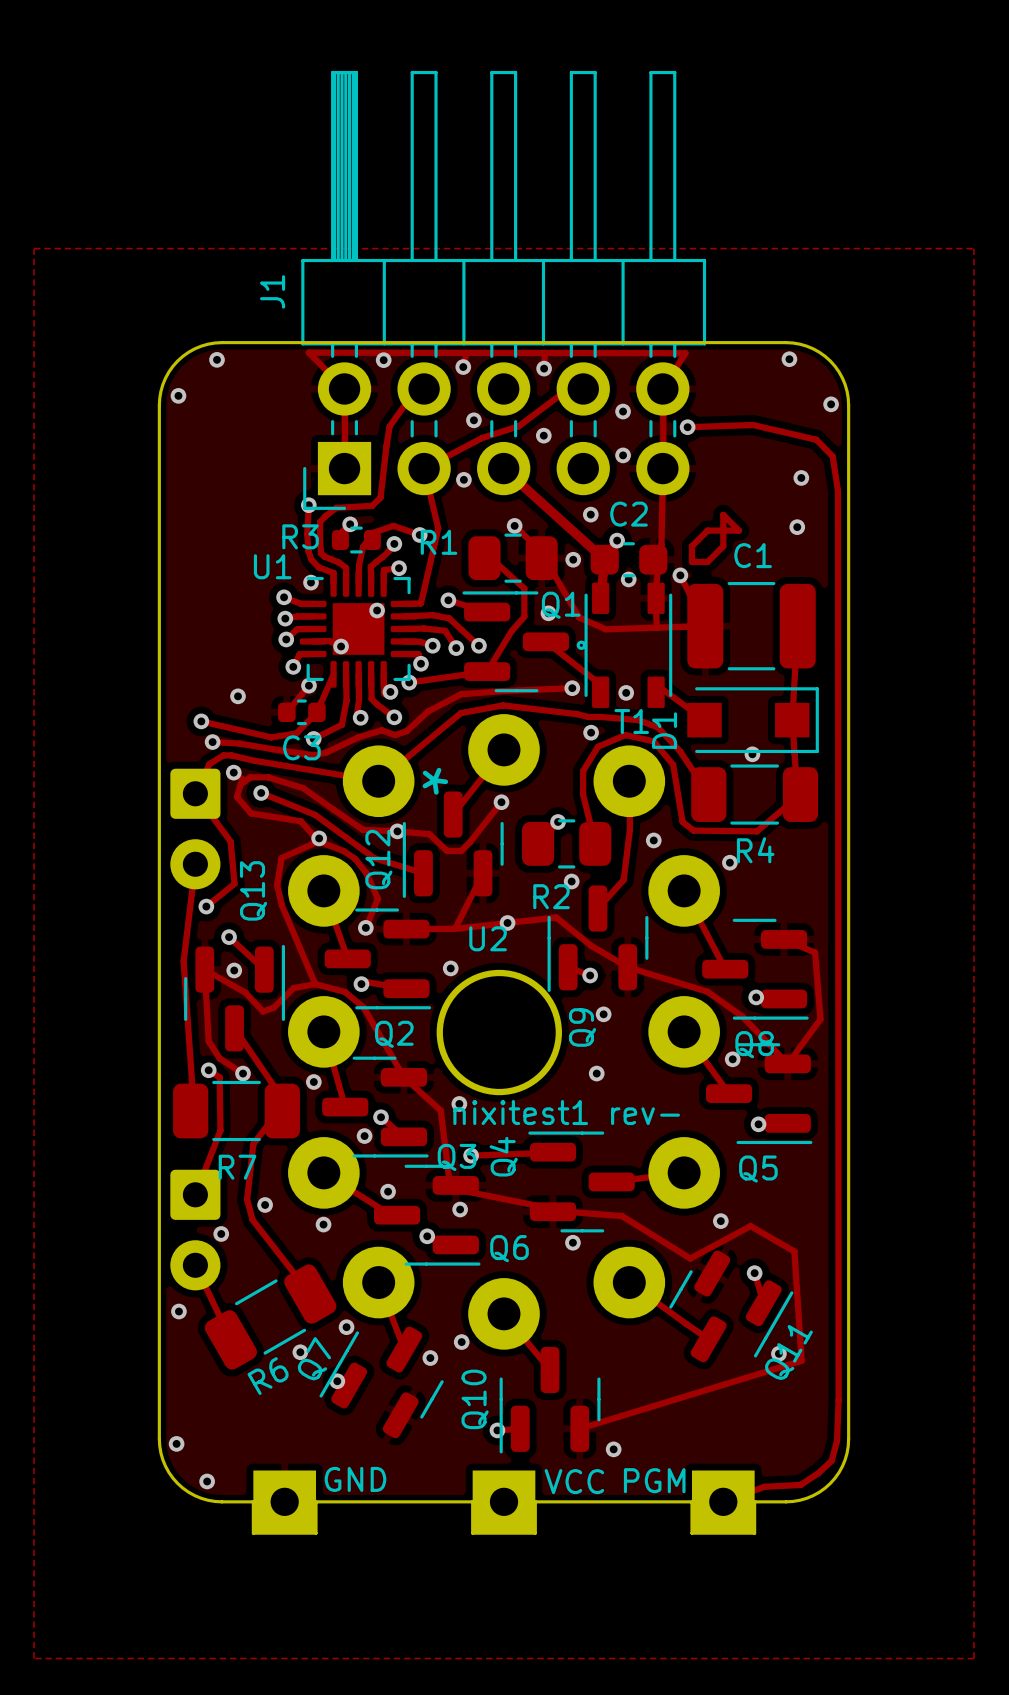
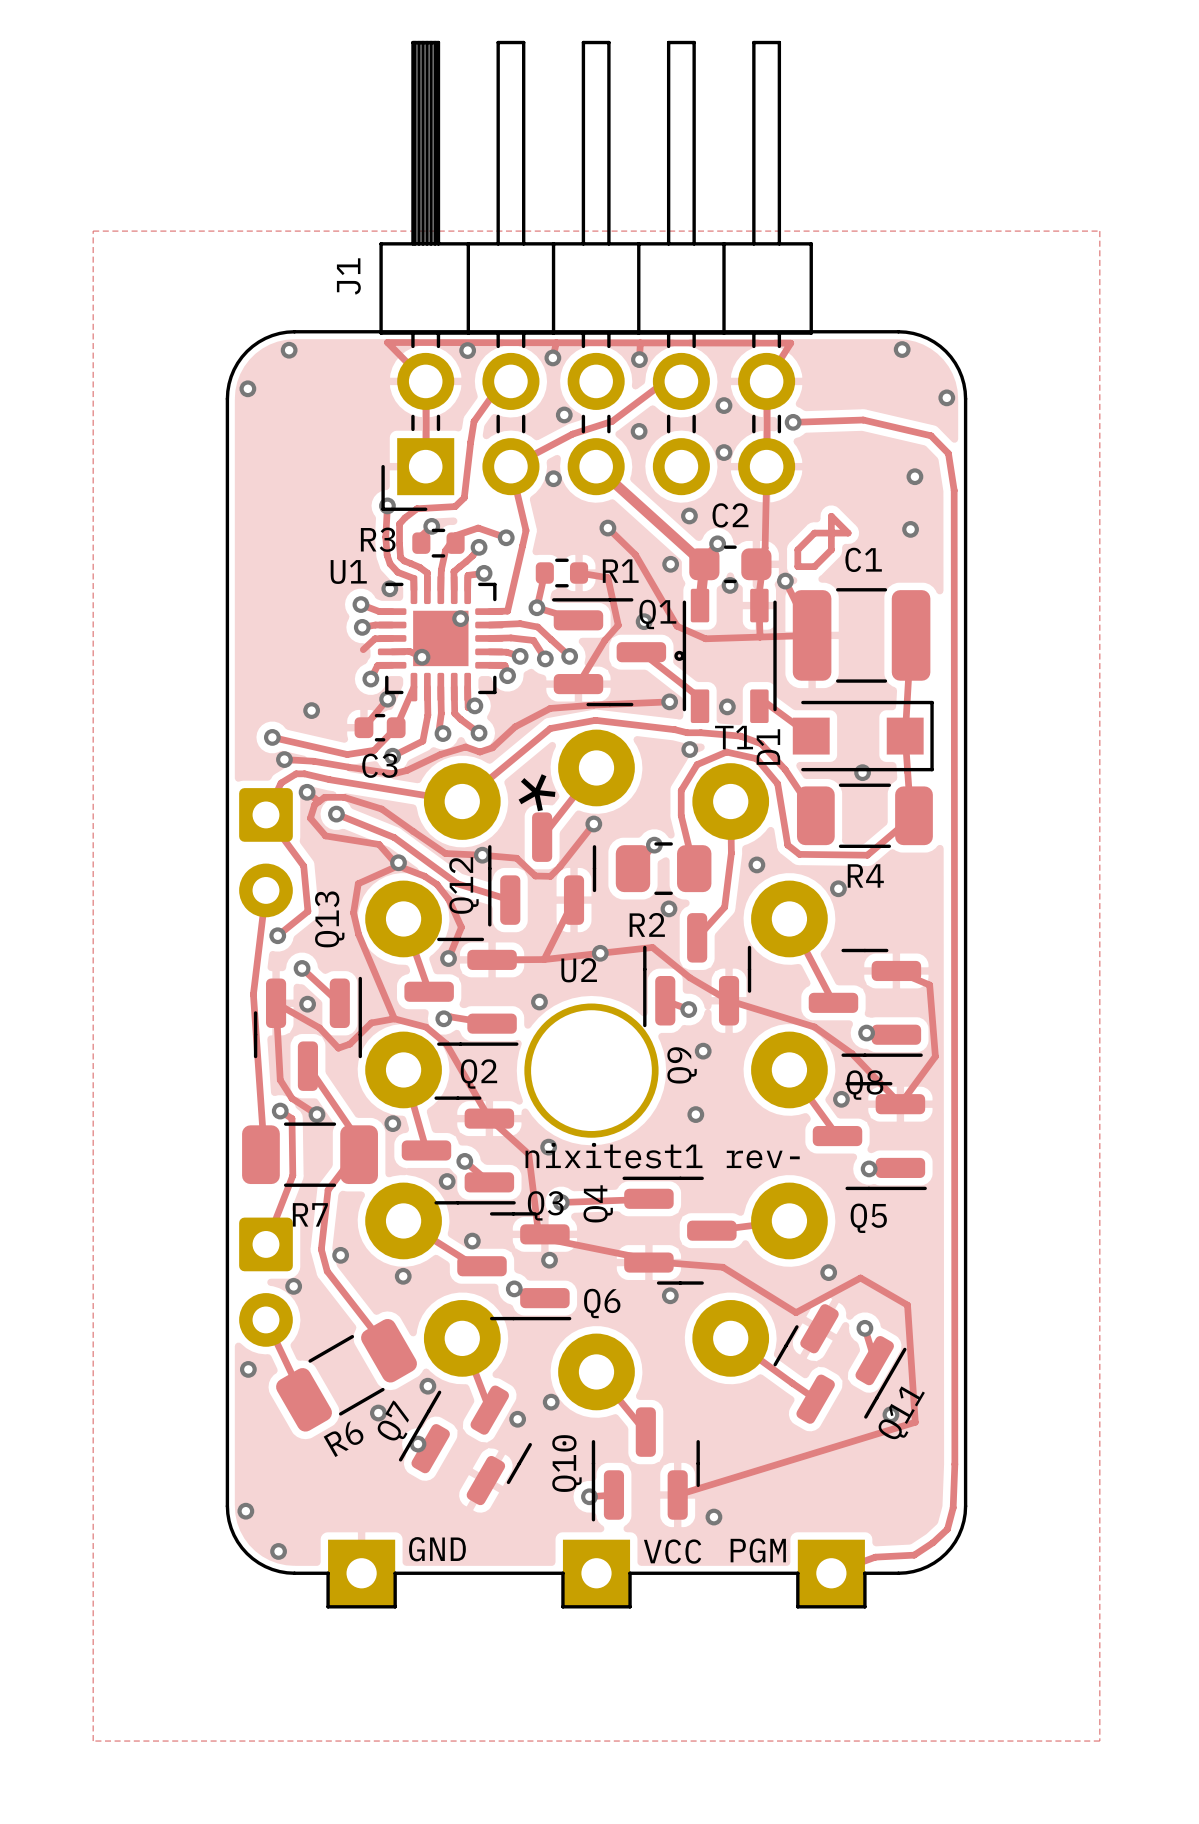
R1 footprint: [468, 533, 558, 583] -> [535, 558, 589, 588]
R1 name position: R1 (439, 542) -> R1 (620, 571)
track: (483, 550) (524, 588) (524, 616) -> (579, 573) (607, 577) (618, 625)
track: none -> (544, 573) (536, 607)
via: (286, 639) -> none
track: (487, 671) (409, 682) -> none
via: (409, 682) -> none

